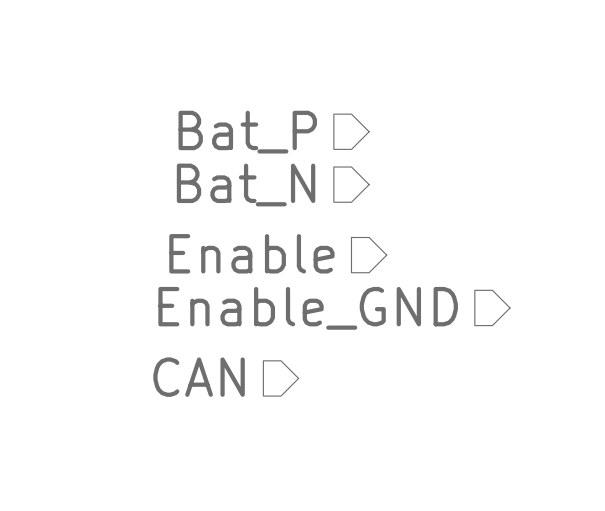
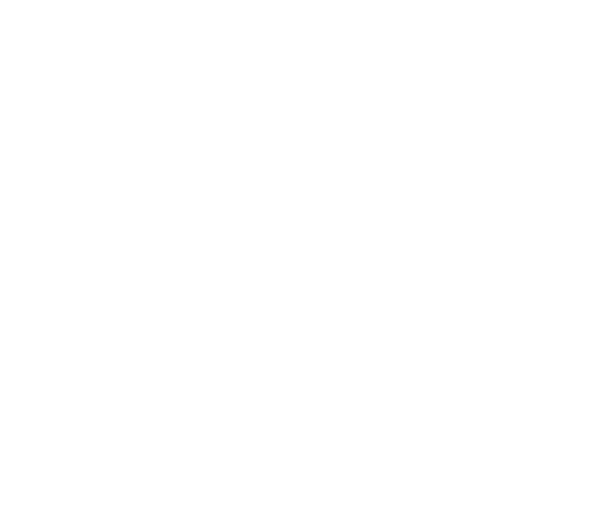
hierarchical label: Bat_P (247, 132) -> none
hierarchical label: Bat_N (246, 184) -> none
hierarchical label: Enable (251, 253) -> none
hierarchical label: Enable_GND (308, 308) -> none
hierarchical label: CAN (199, 377) -> none

